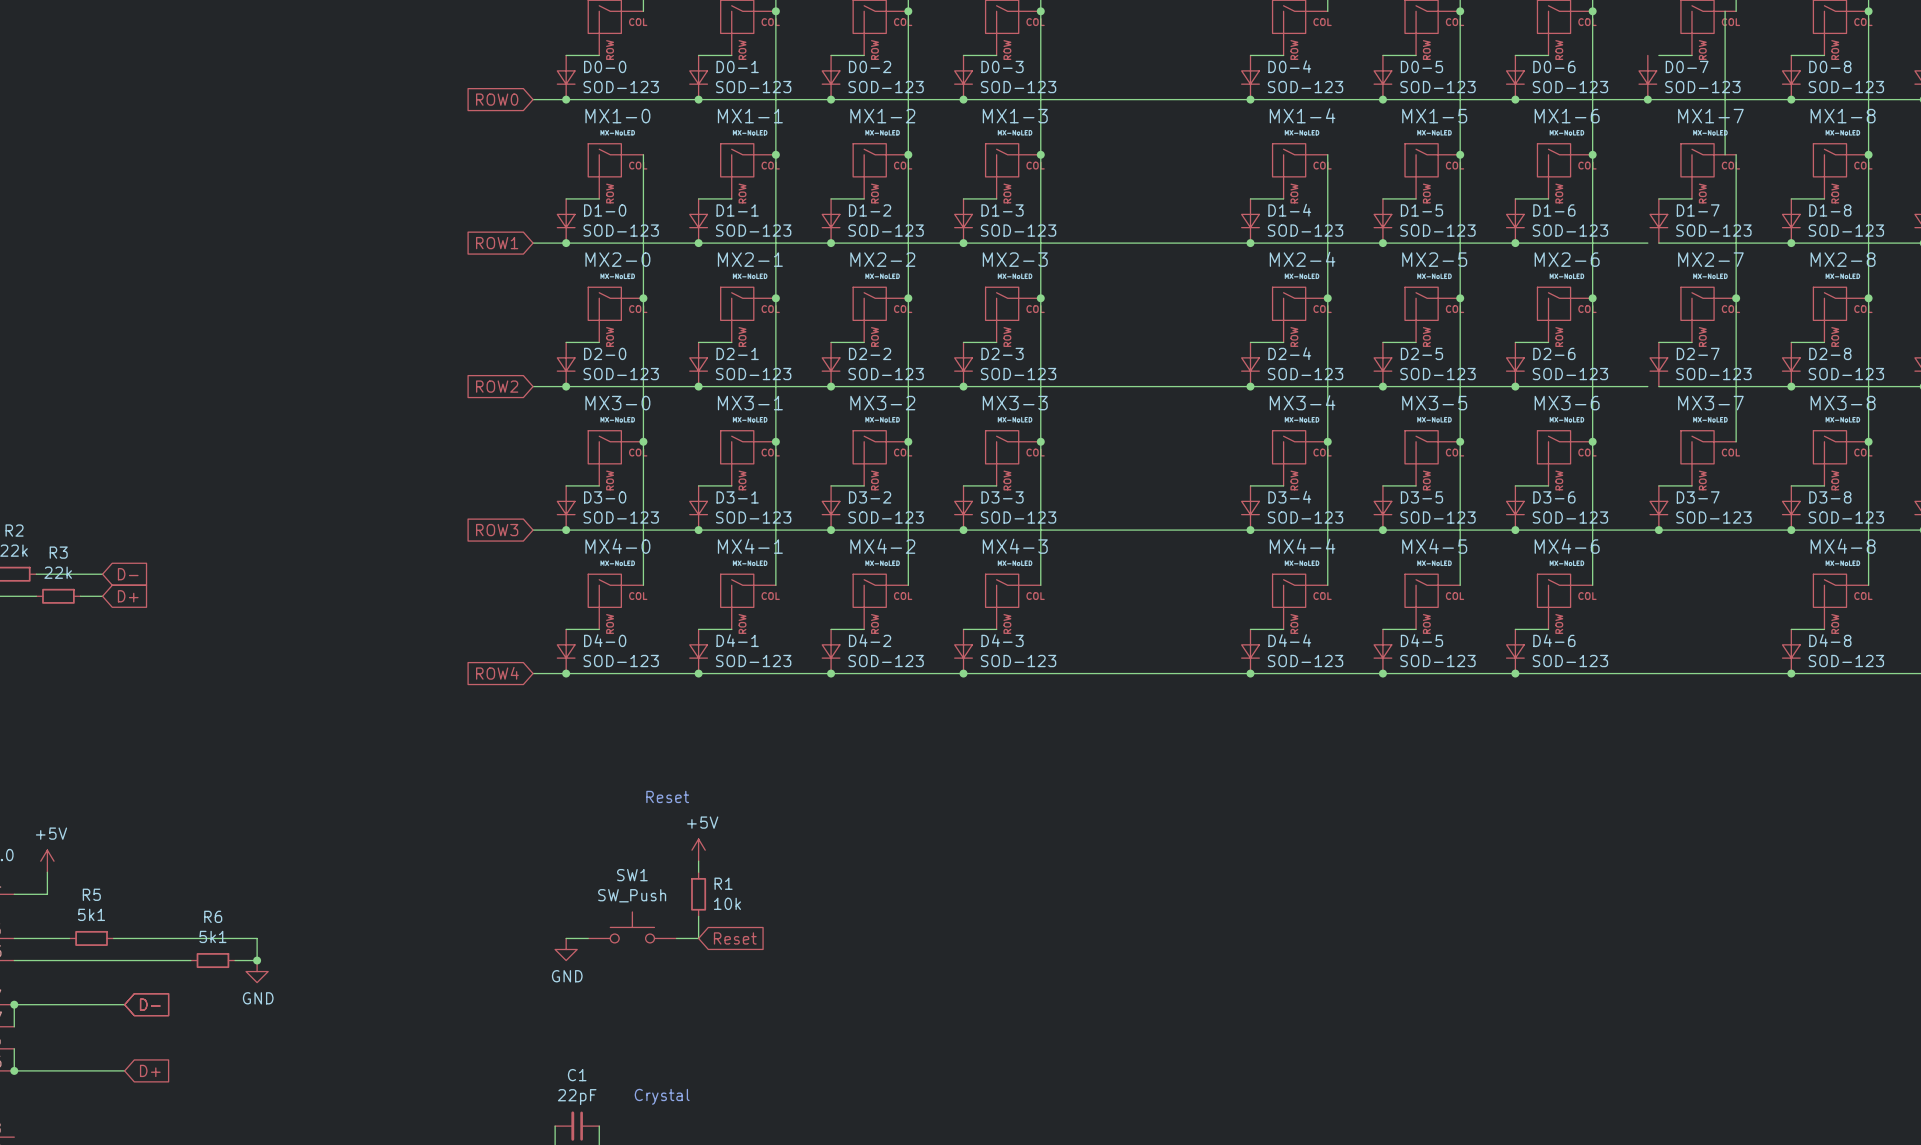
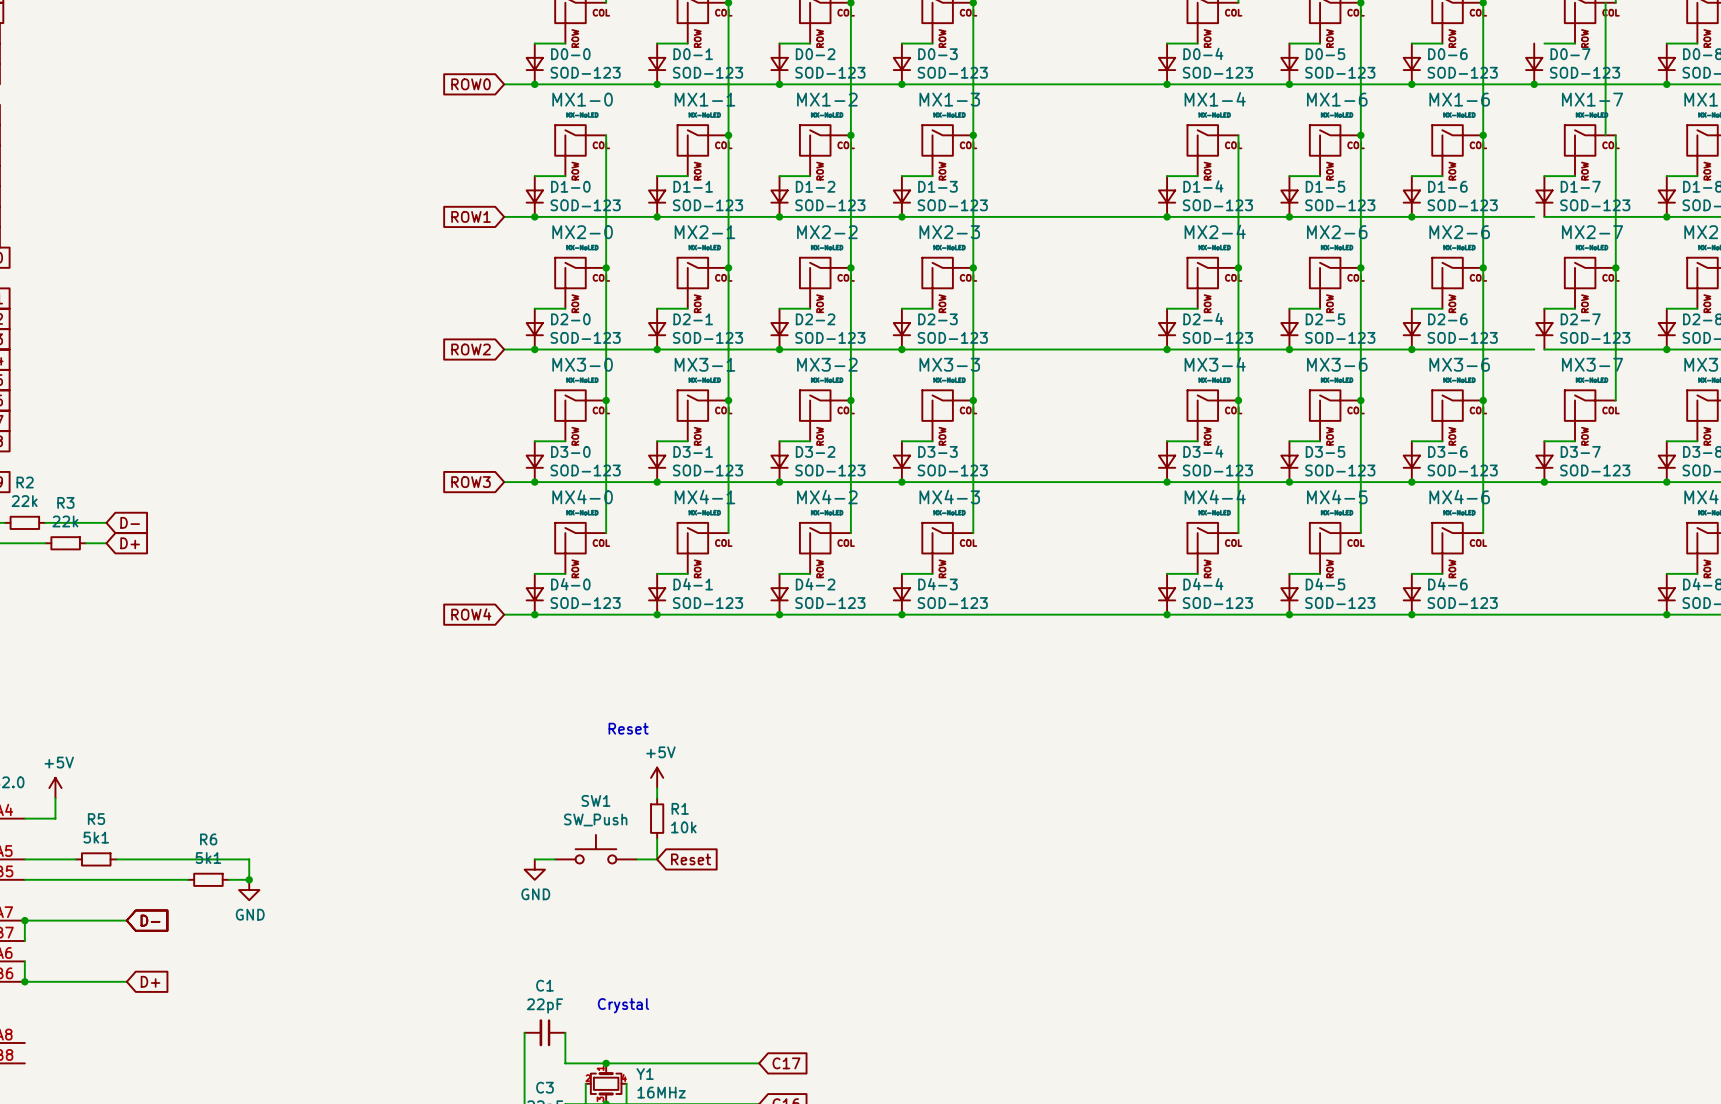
MX1-5 name: MX1-5 (1434, 116) -> MX1-6 (1337, 99)
MX2-5 name: MX2-5 (1434, 259) -> MX2-6 (1337, 232)
MX3-5 name: MX3-5 (1434, 403) -> MX3-6 (1337, 364)

